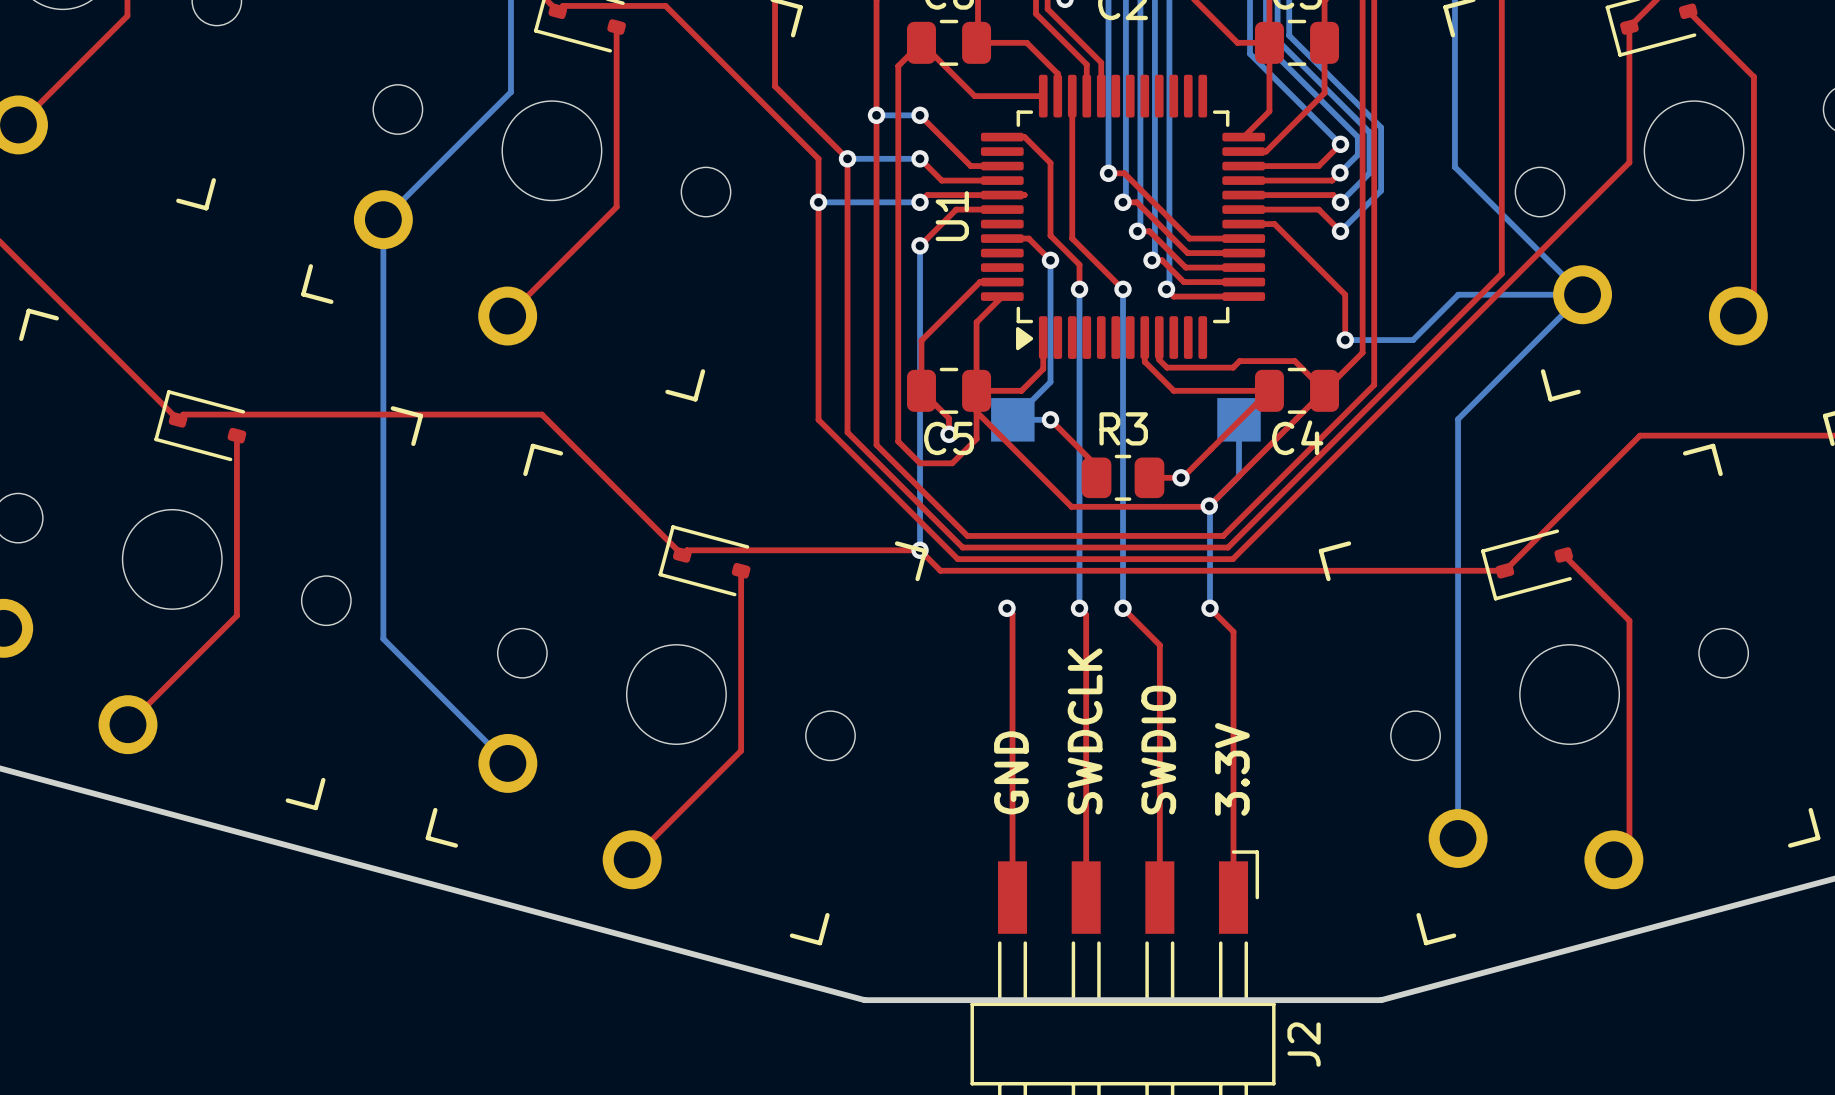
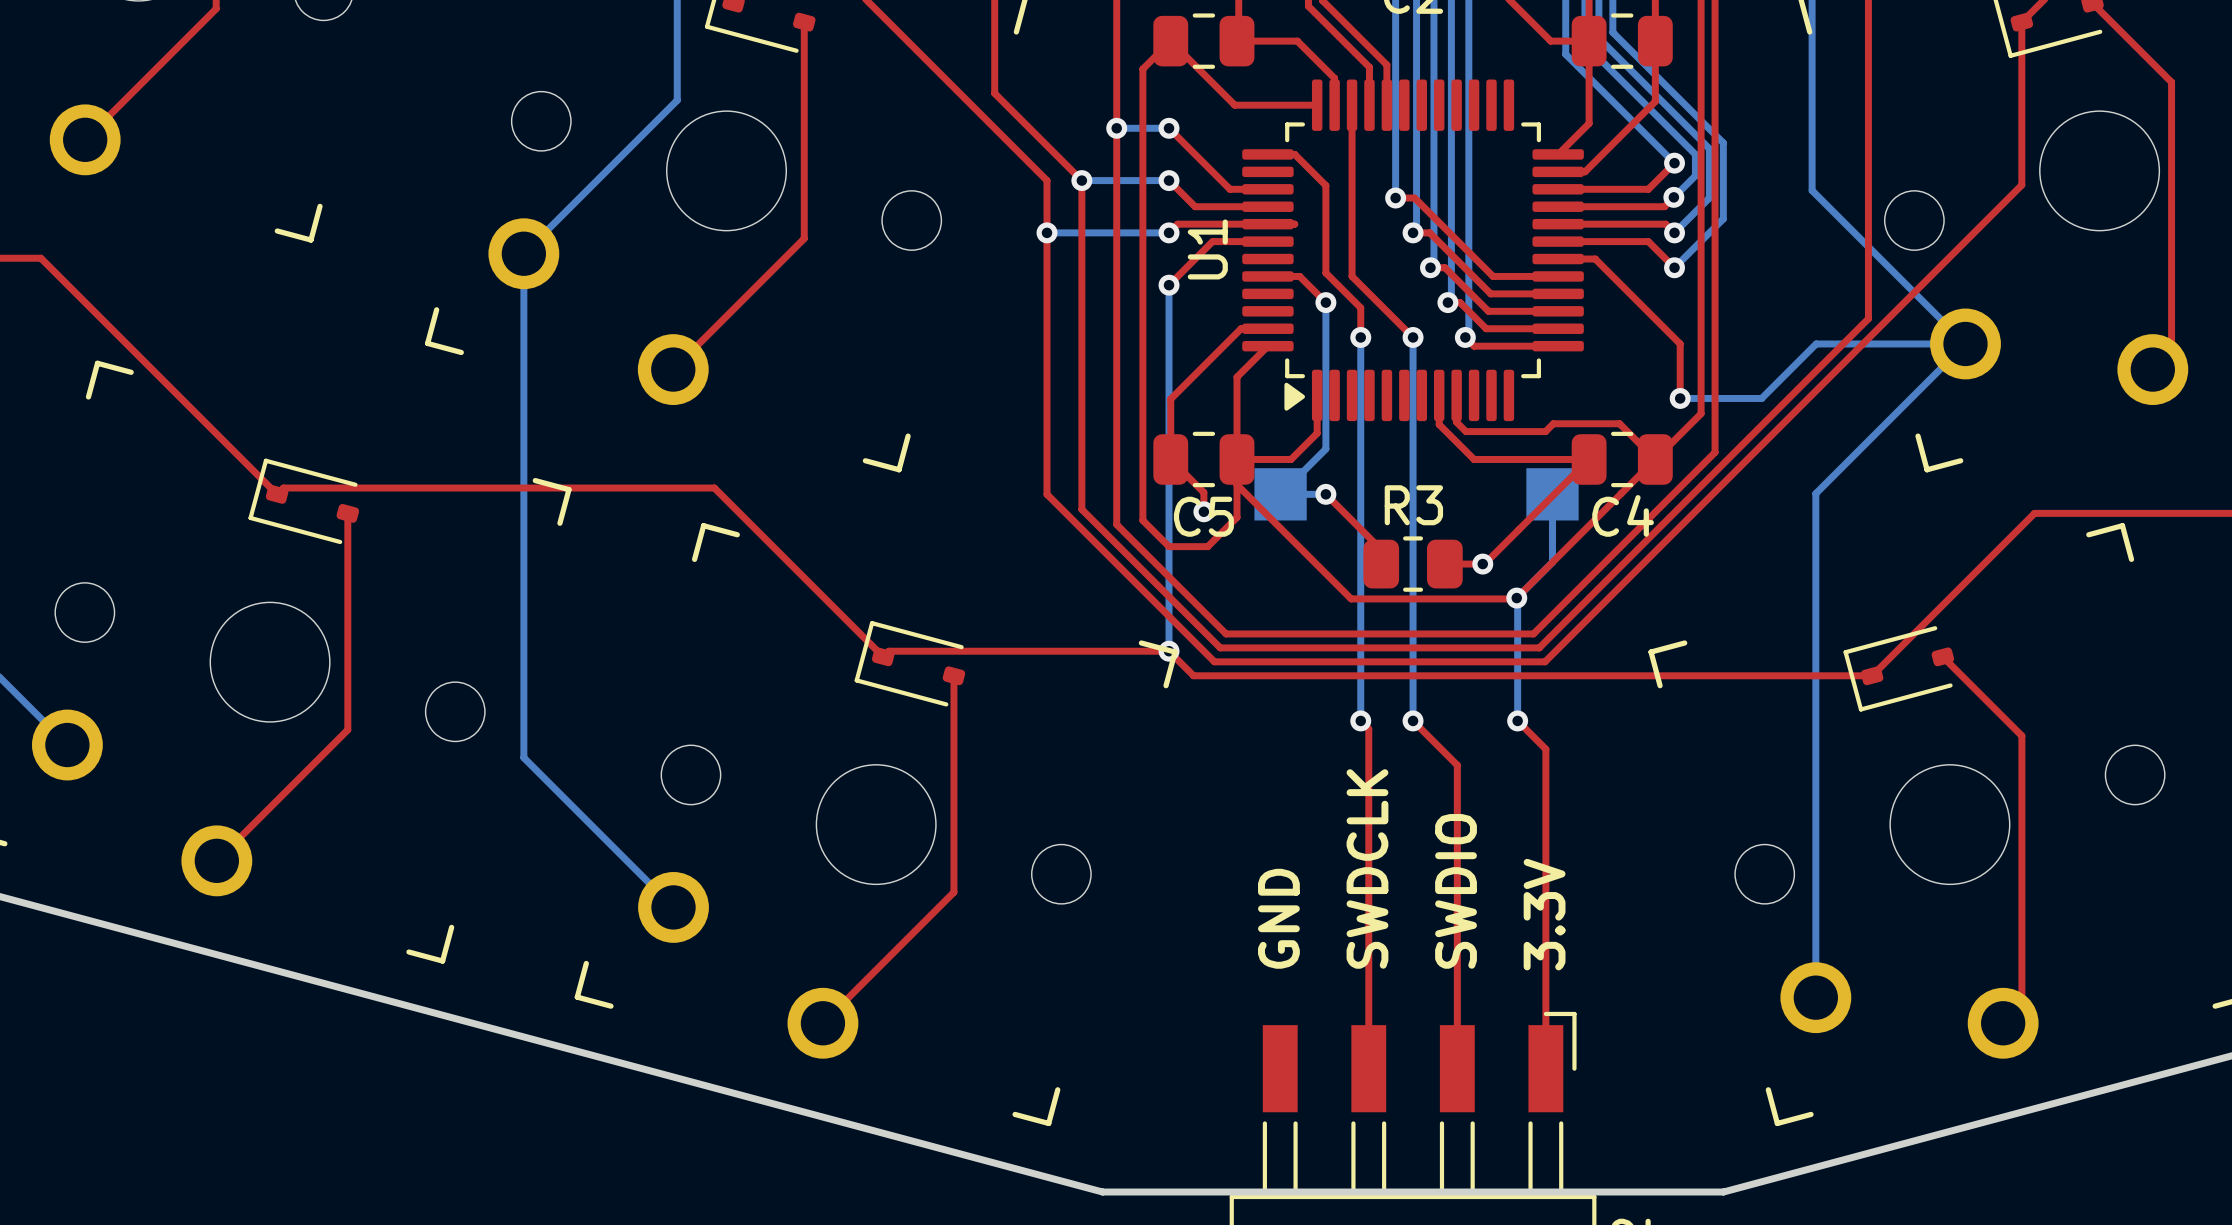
top track: (1007, 608) (1012, 613) (1012, 897) -> none
via: (1007, 608) -> none

